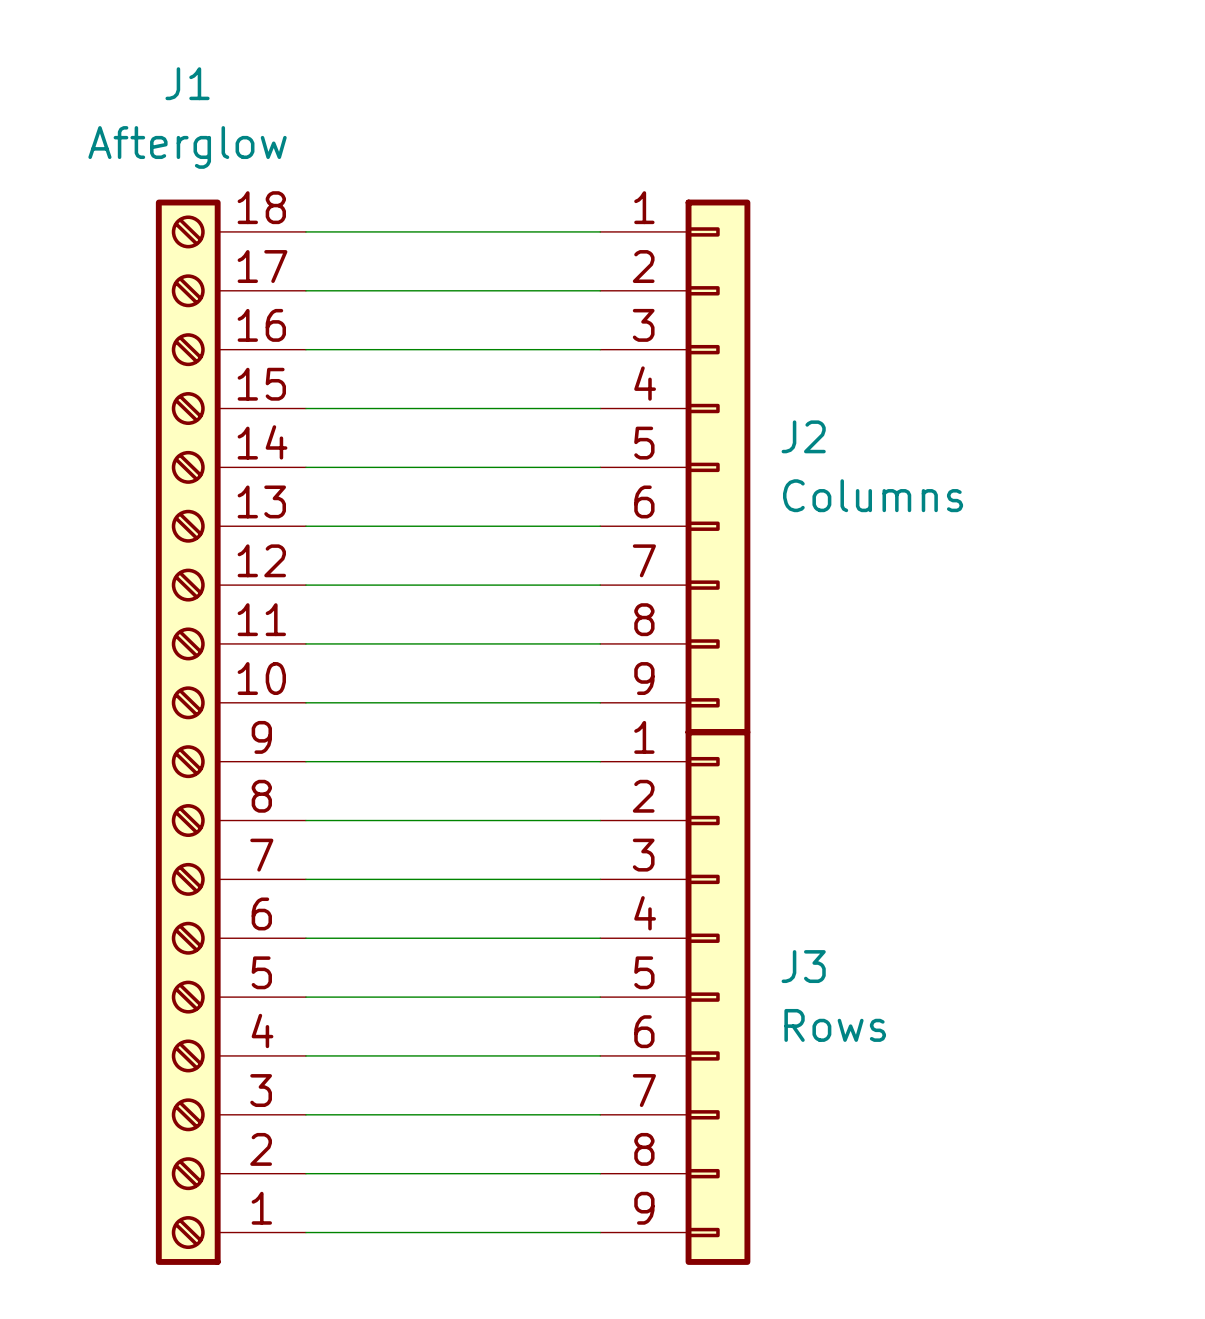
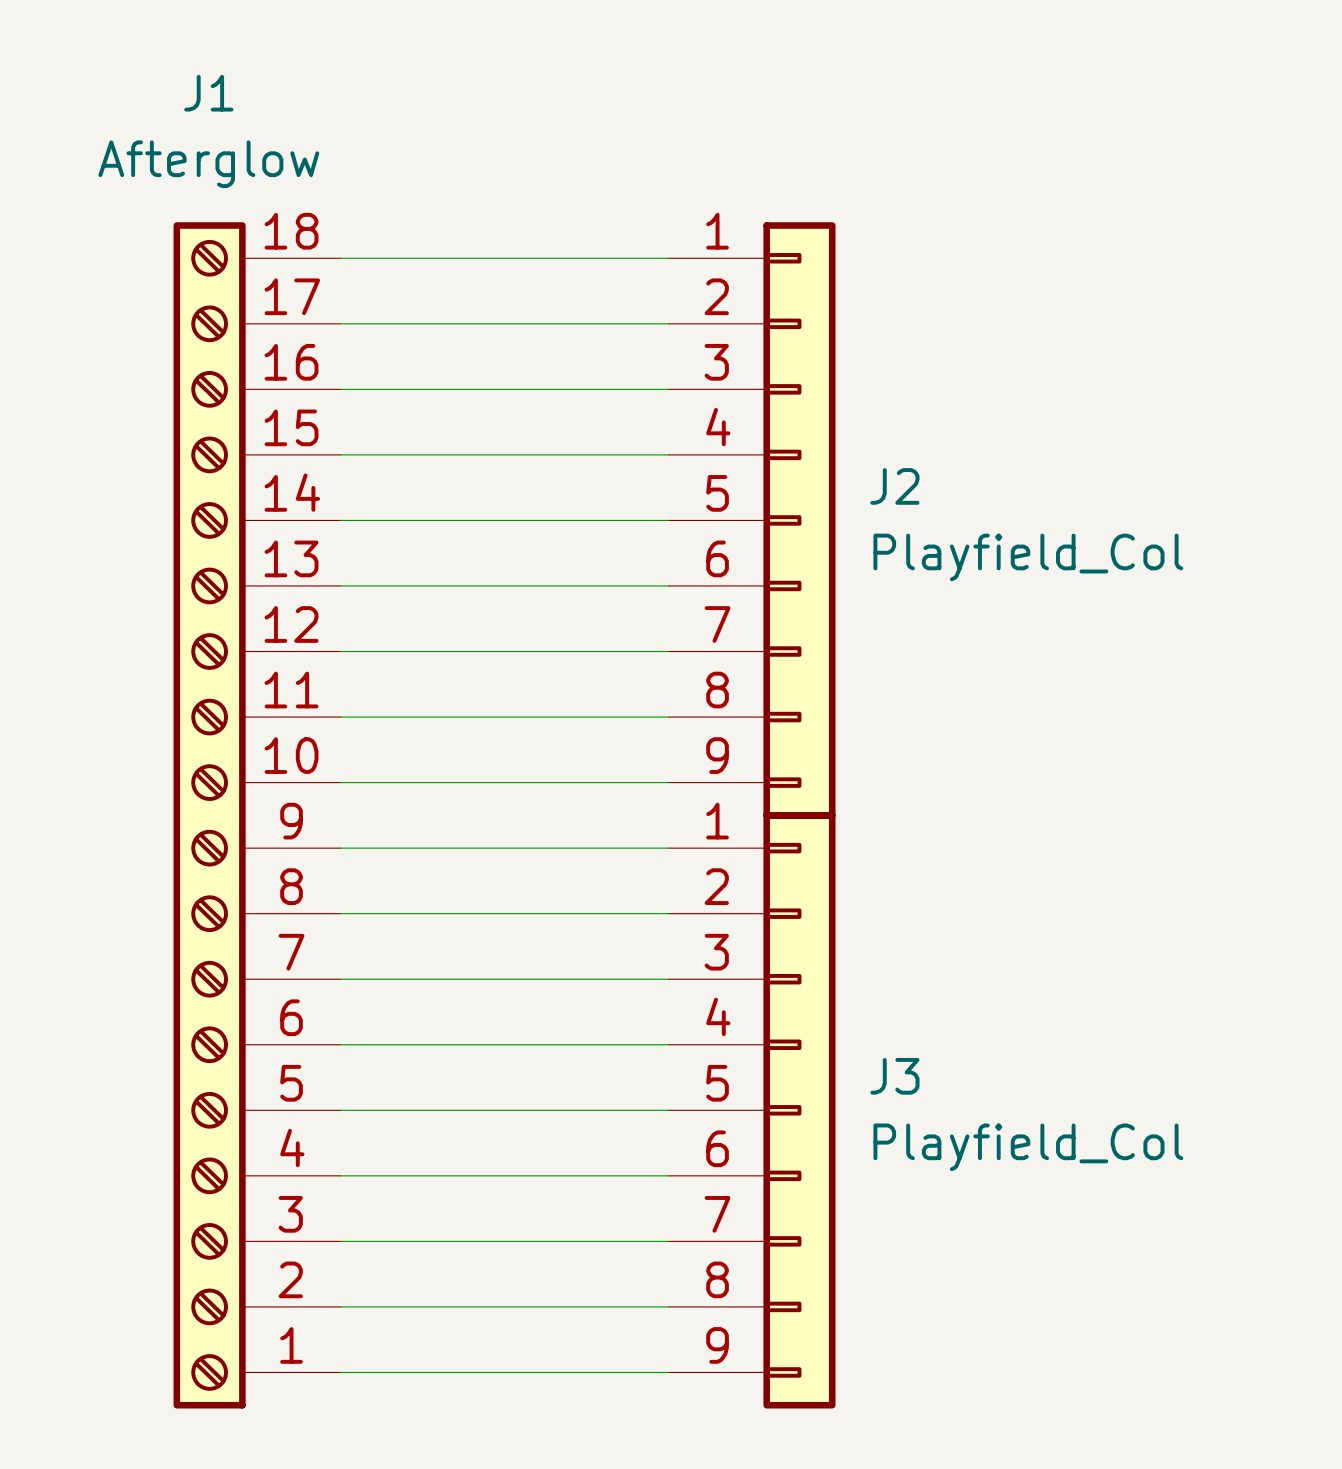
J2 value: Columns (873, 495) -> Playfield_Col (1028, 557)
J3 value: Rows (835, 1025) -> Playfield_Col (1028, 1147)

